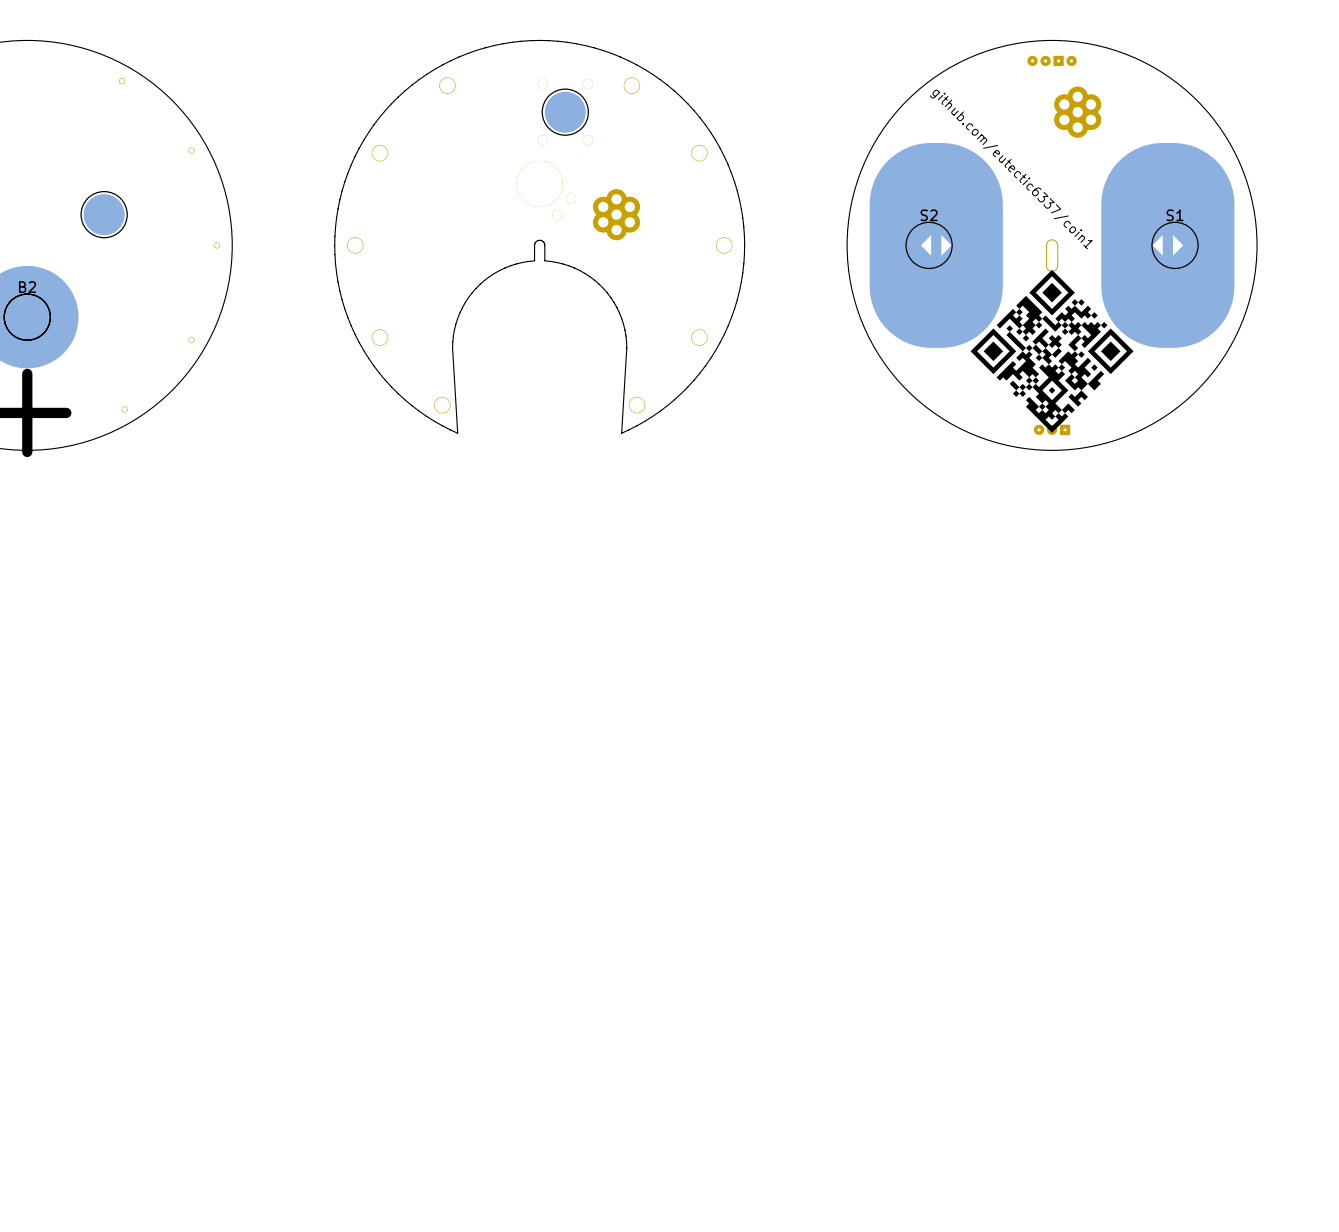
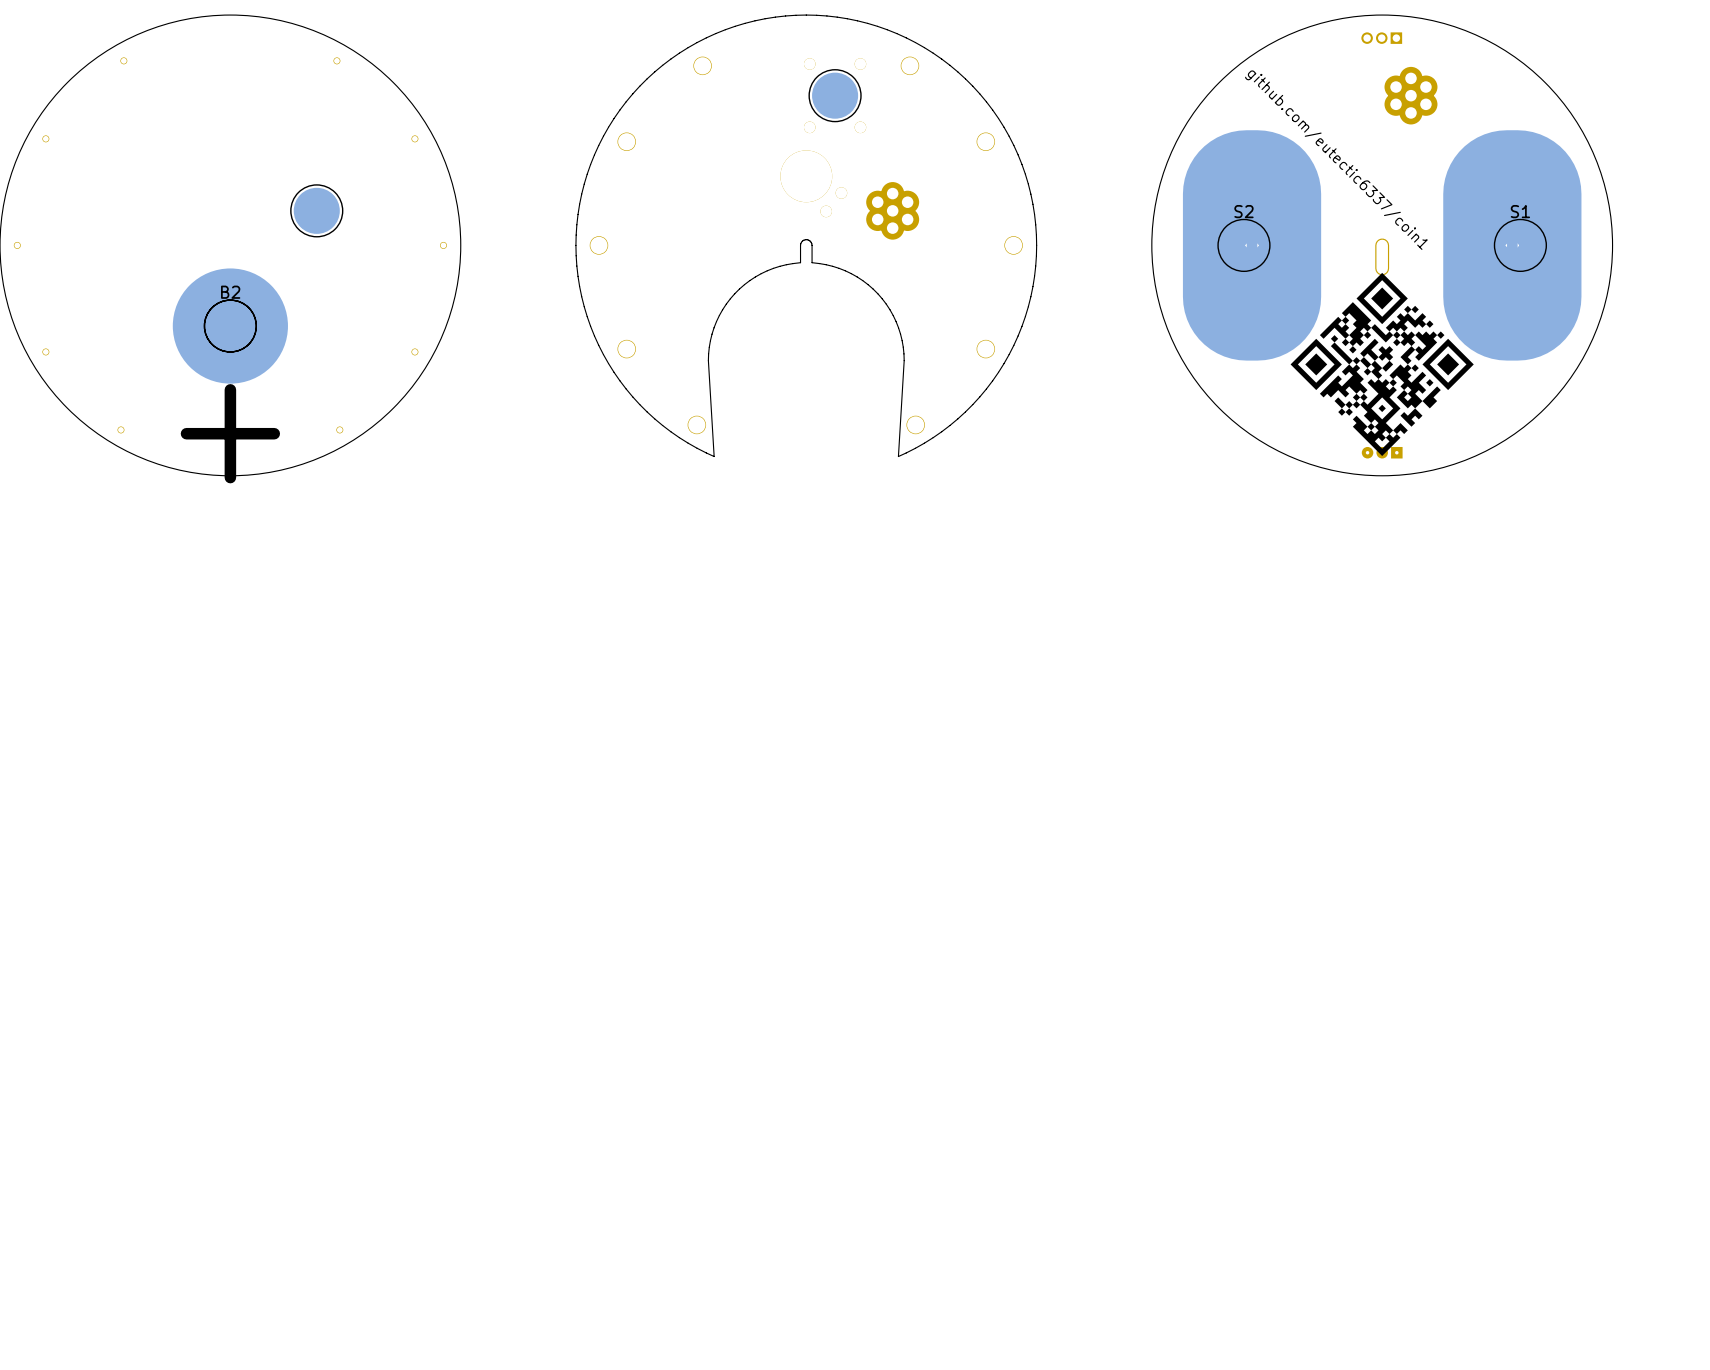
part footprint: [1027, 55, 1077, 67] -> [1361, 32, 1403, 44]
S2 footprint: [869, 142, 1003, 348] -> [1182, 130, 1322, 361]
S1 footprint: [1101, 142, 1235, 348] -> [1443, 130, 1582, 361]

